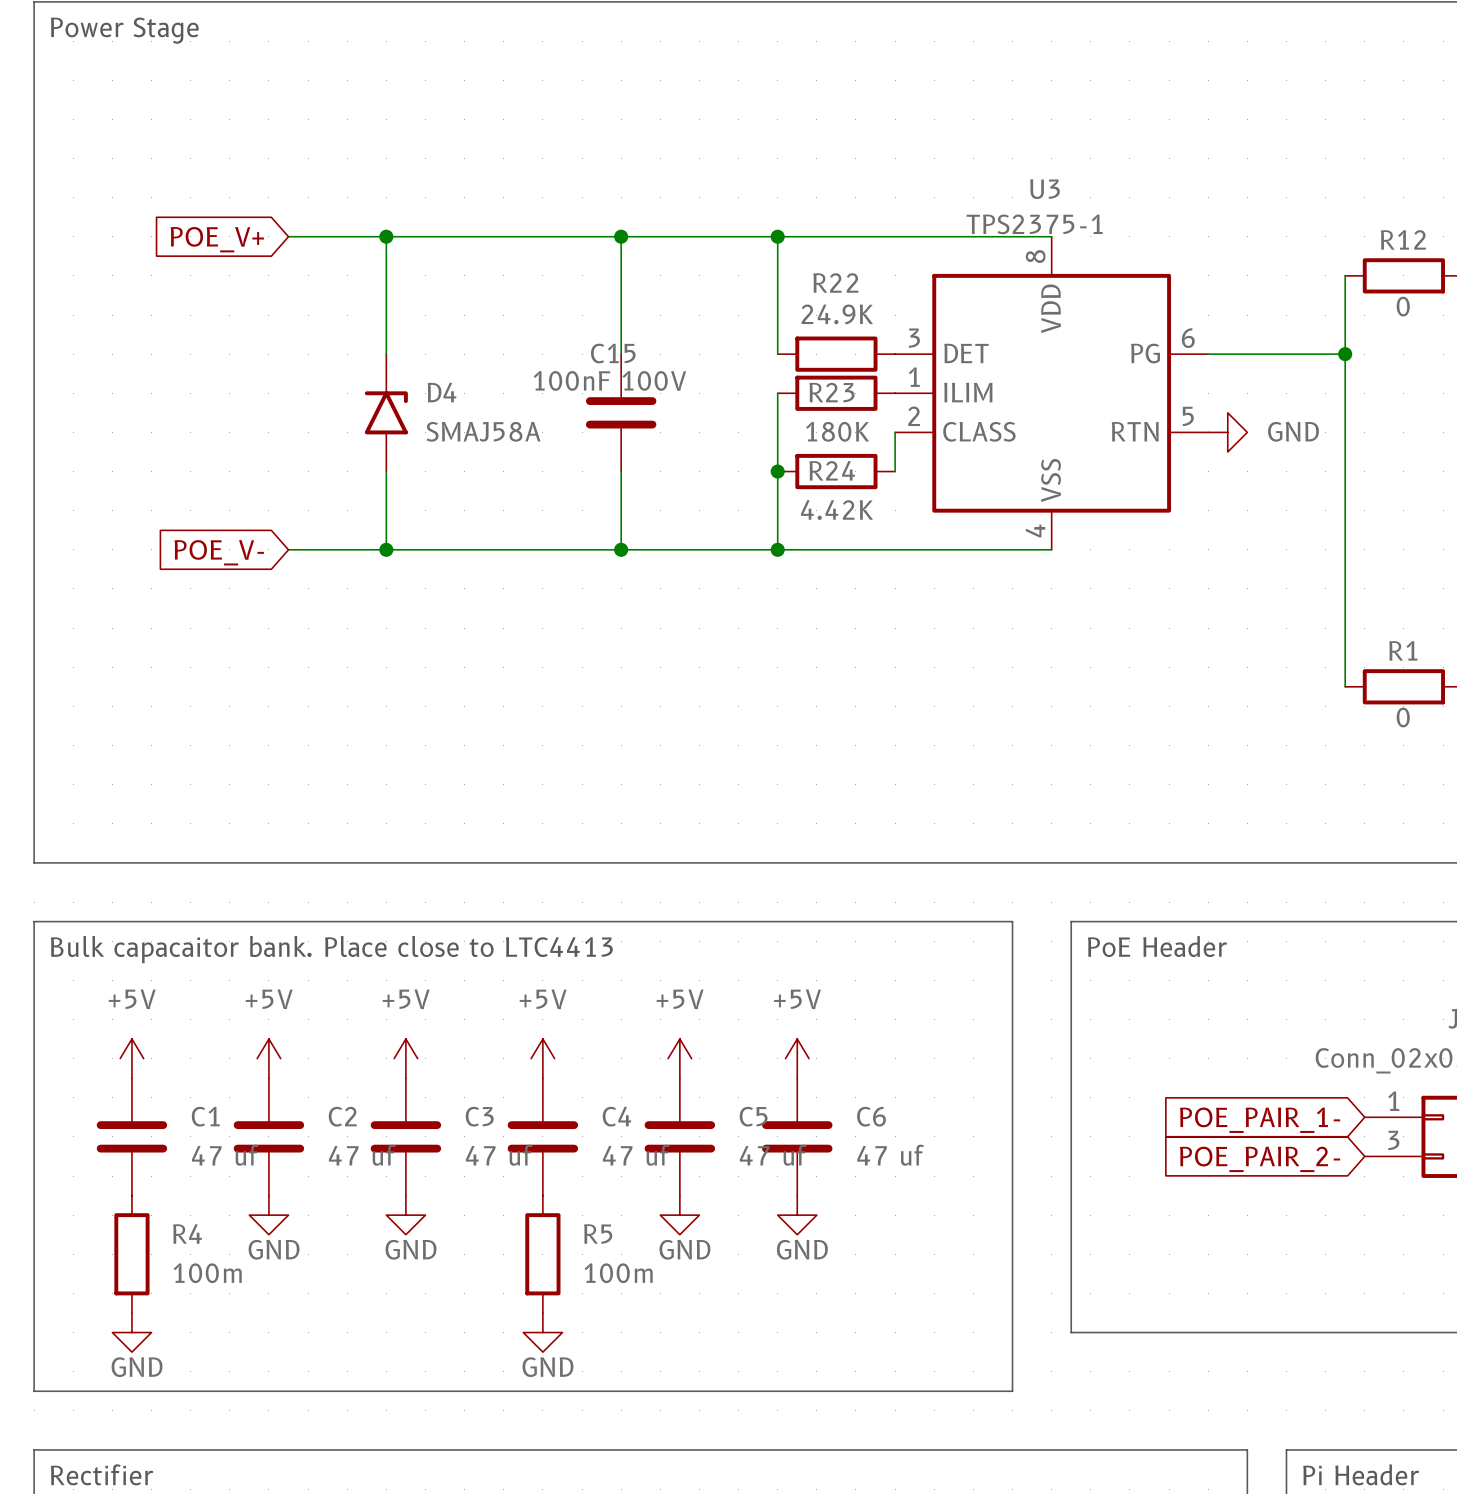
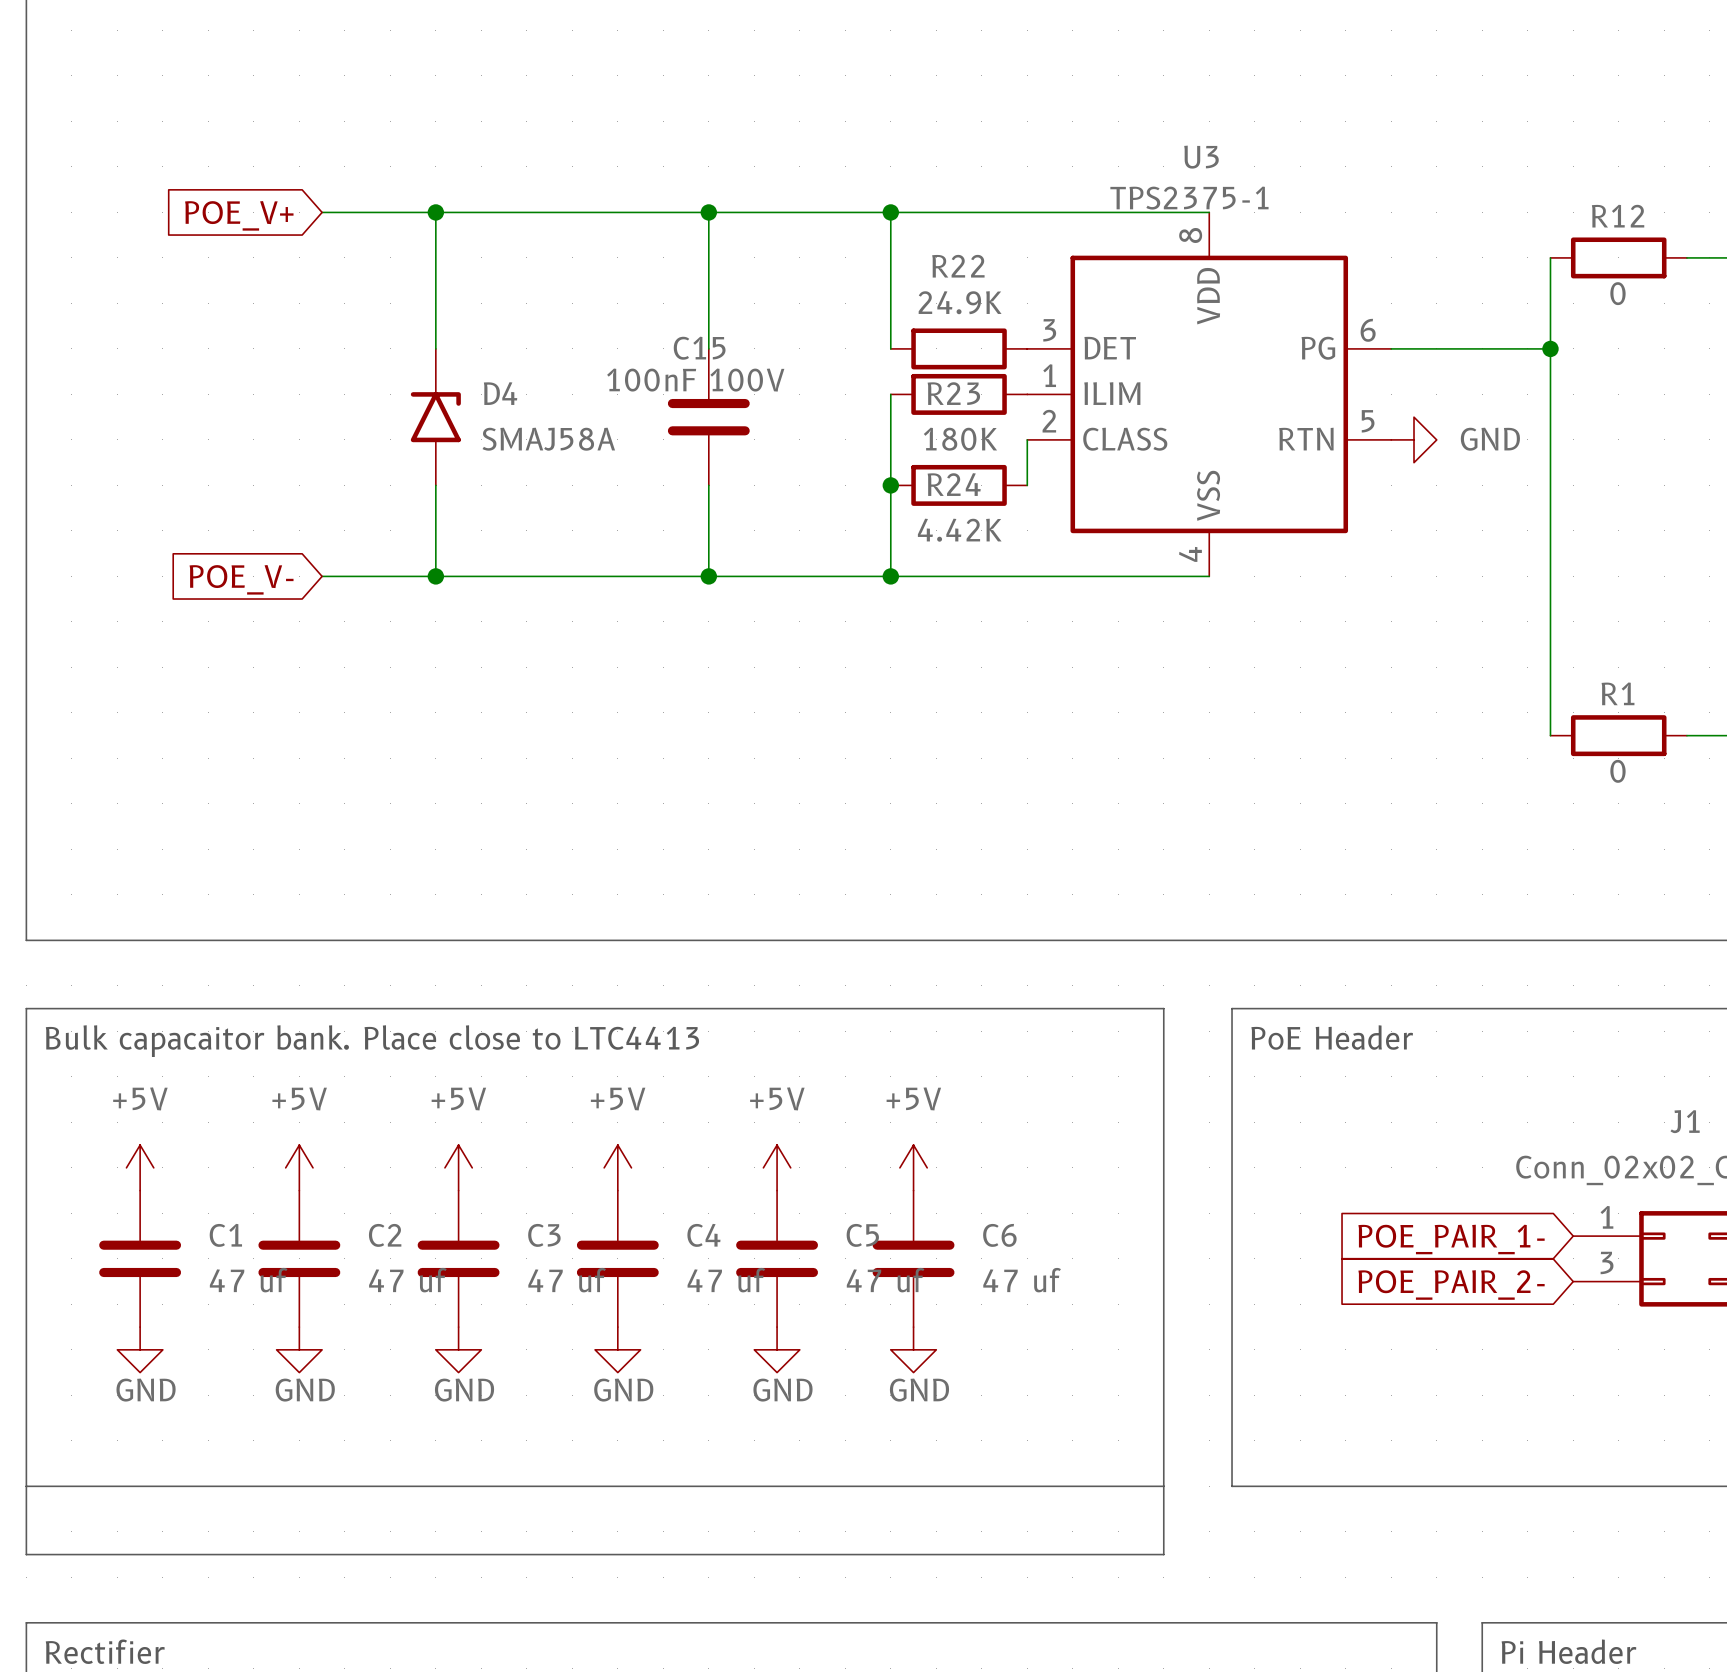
R4: 100m (131, 1254) -> none
R5: 100m (542, 1254) -> none
line: none -> (26, 1486) (1163, 1486)
power symbol position: GND (131, 1332) -> GND (140, 1349)
power symbol position: GND (542, 1332) -> GND (617, 1349)

